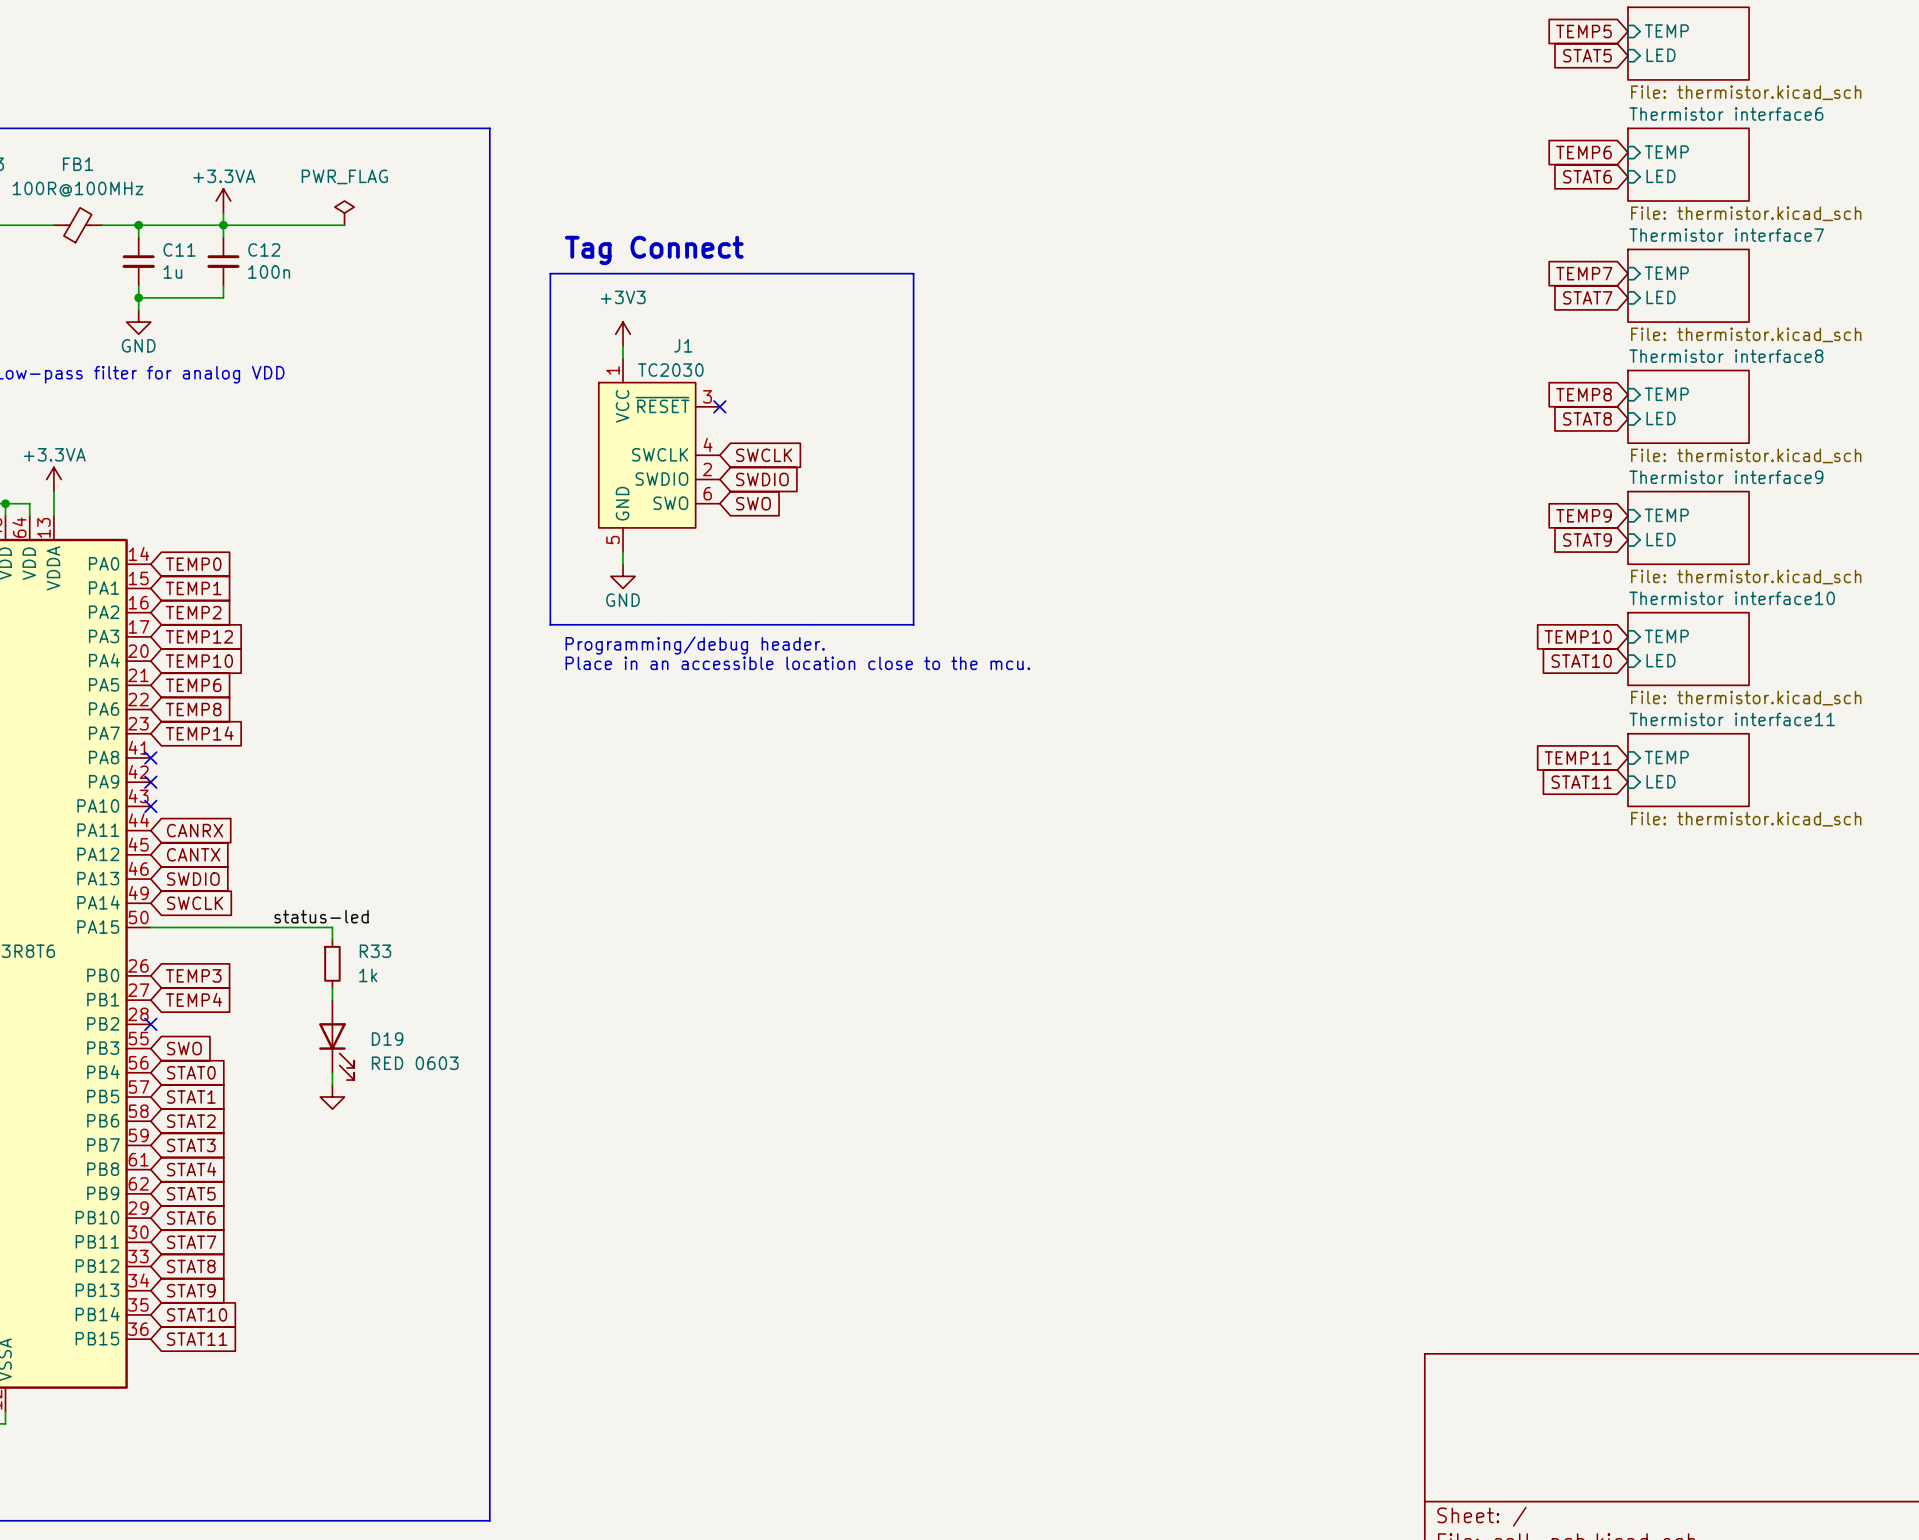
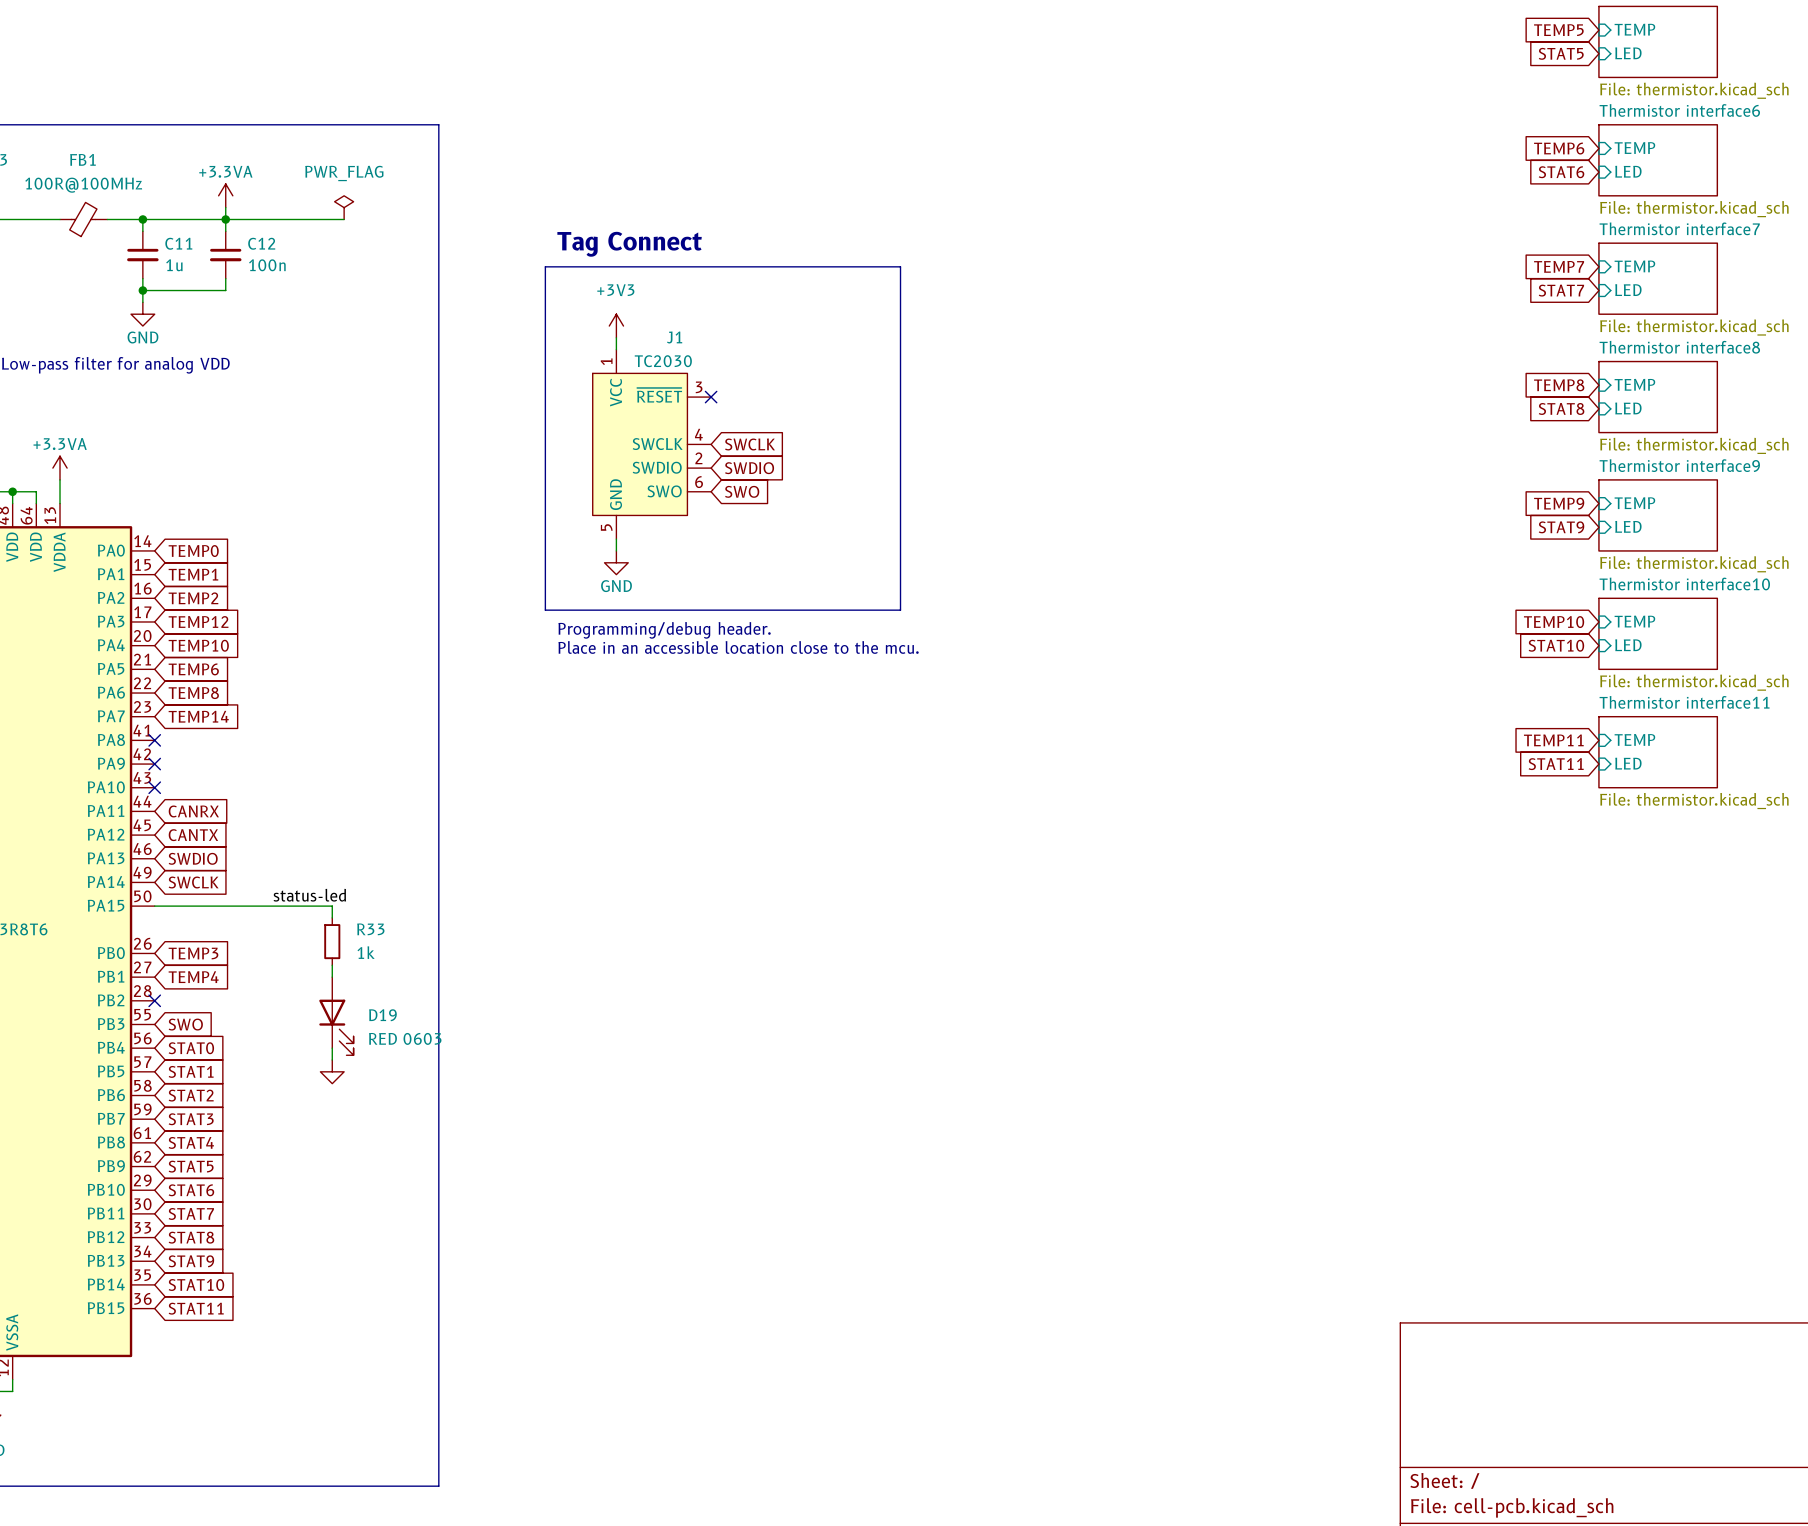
line: (441, 128) (489, 128) (489, 1520) (441, 1520) -> (438, 124) (438, 1486)

